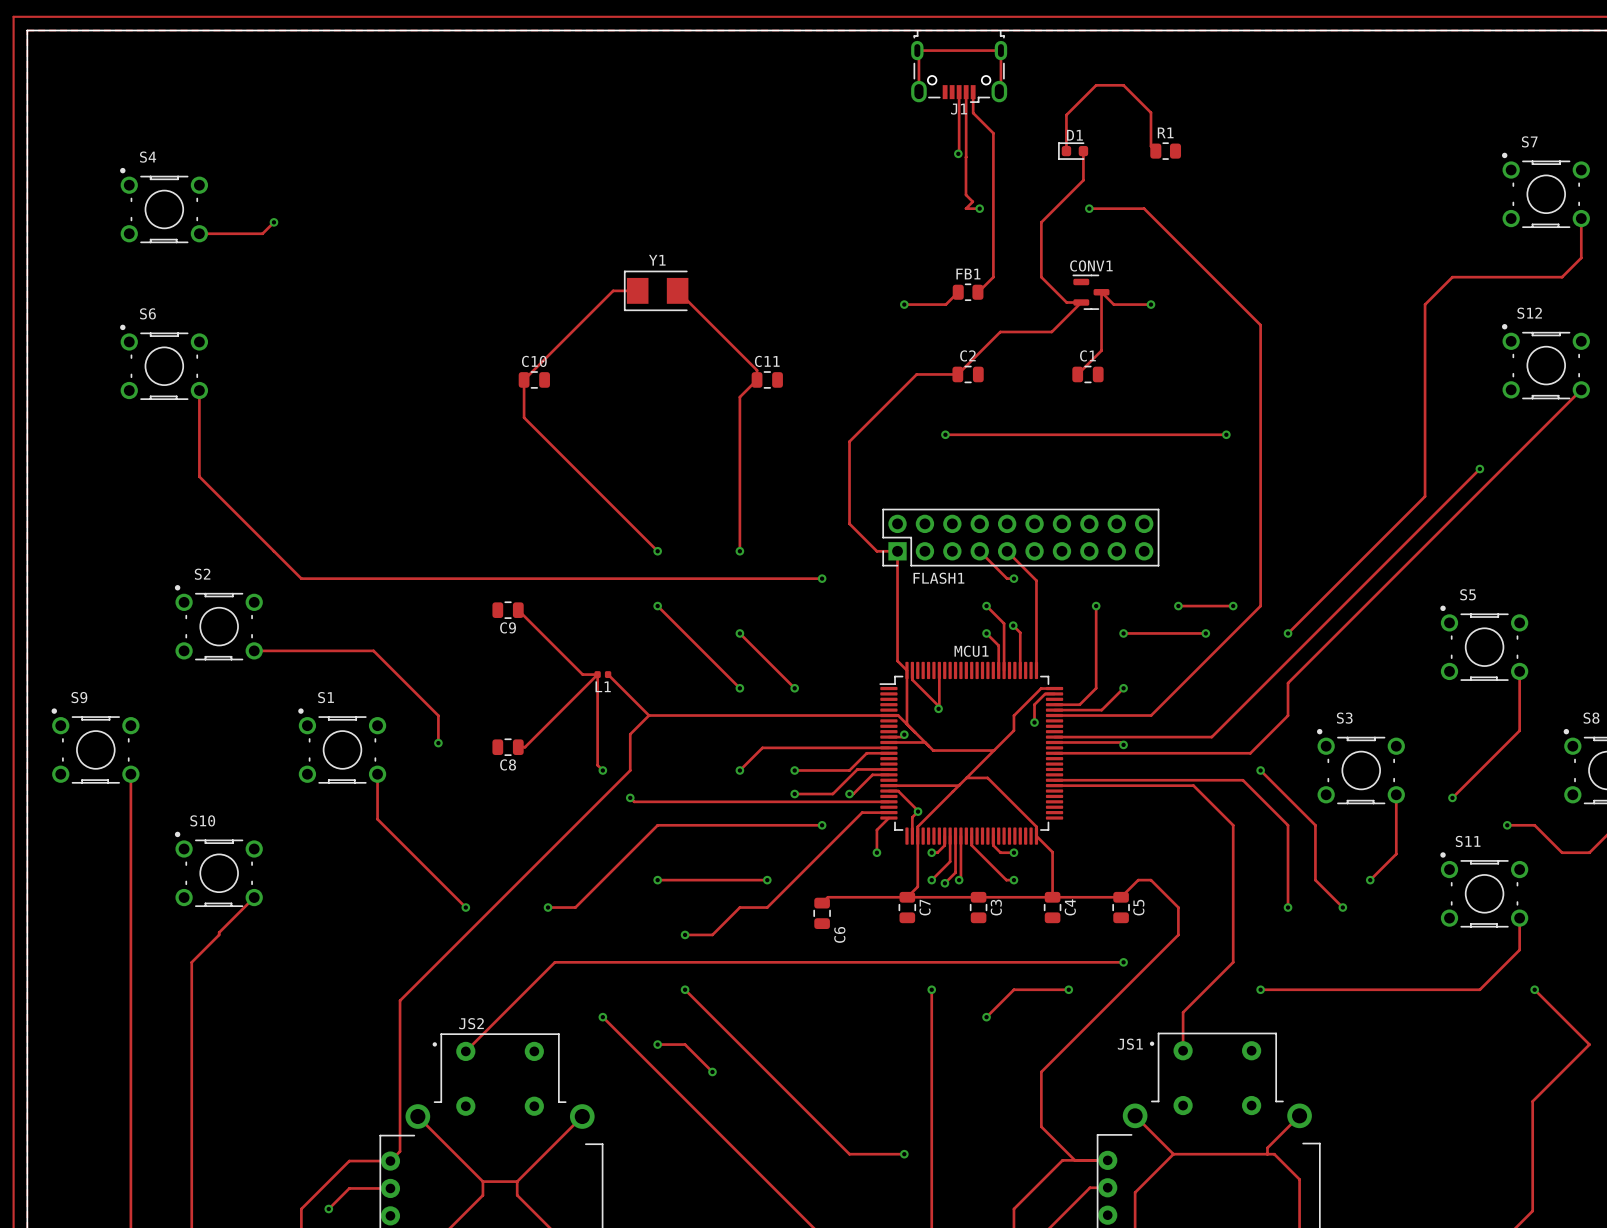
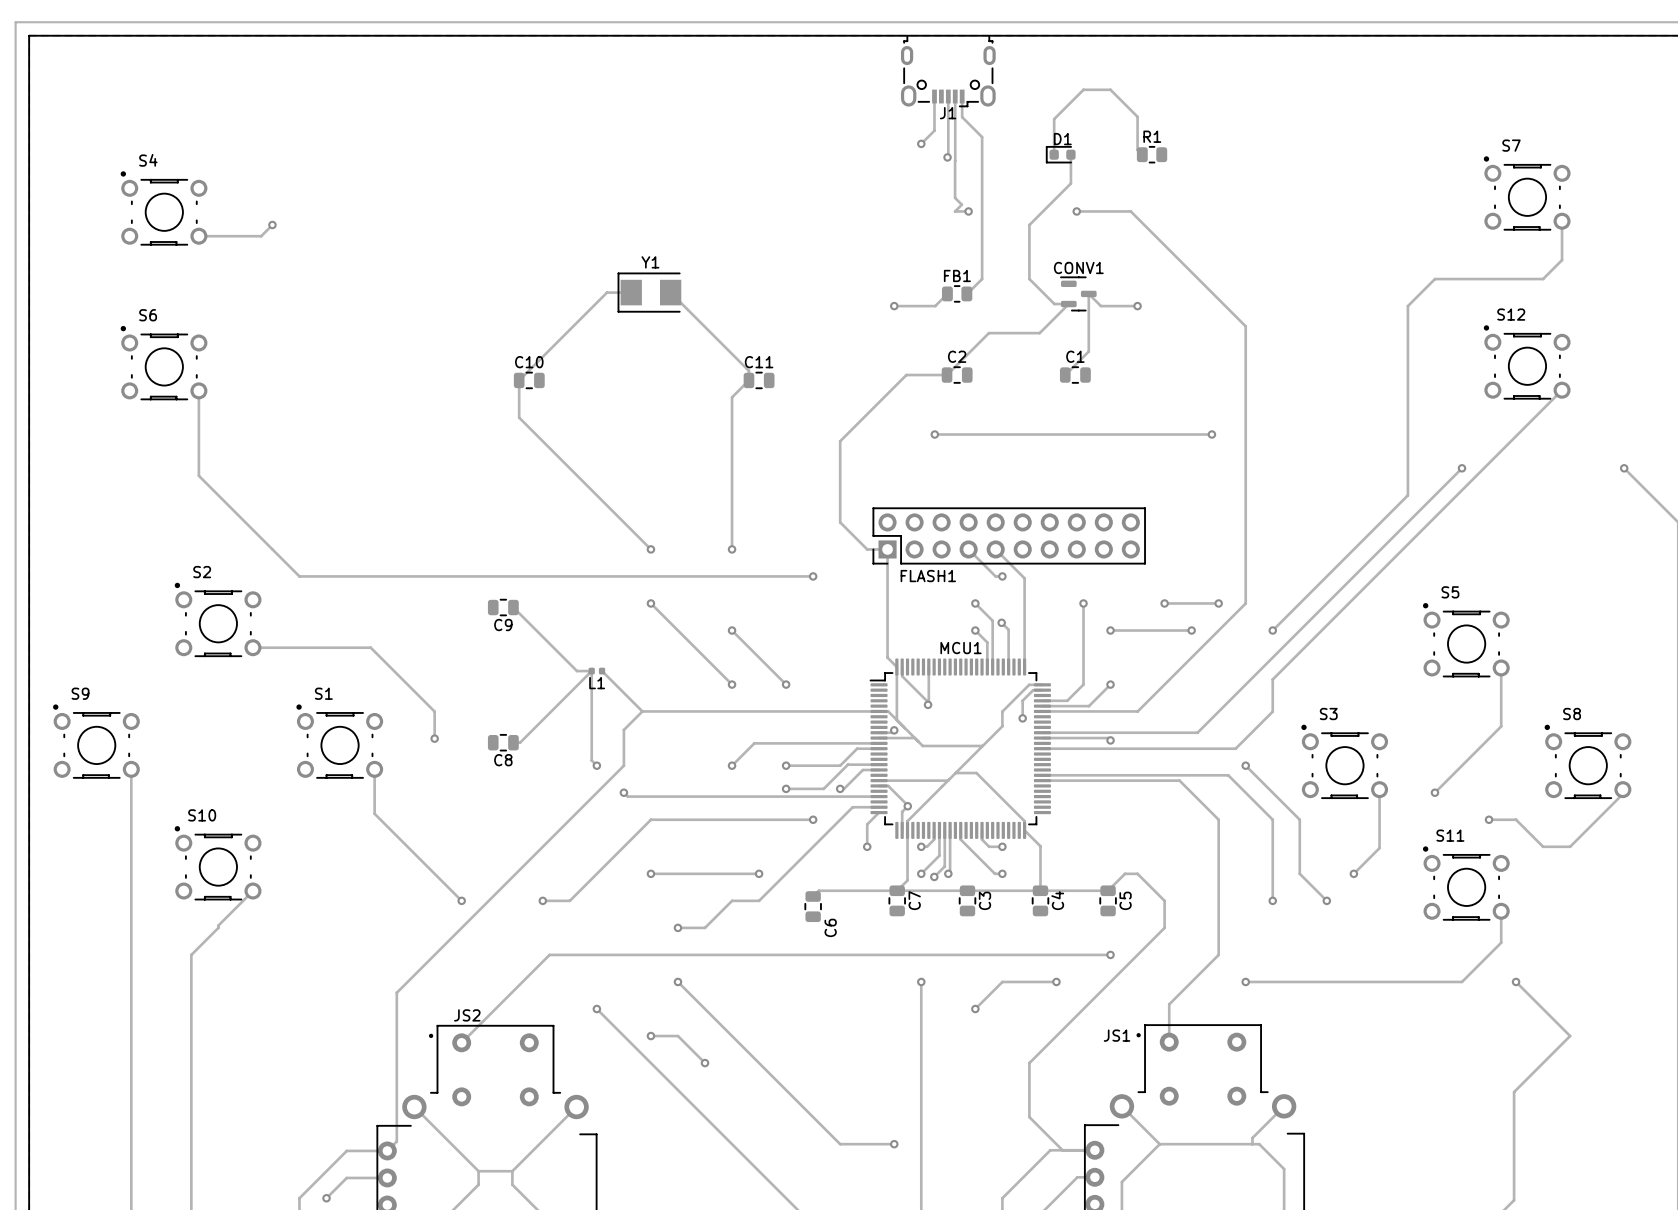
track: (917, 50) (1000, 50) (1000, 89) -> none
track: (918, 52) (918, 91) -> none
track: none -> (934, 96) (934, 130) (921, 143)
via: none -> (921, 143)

